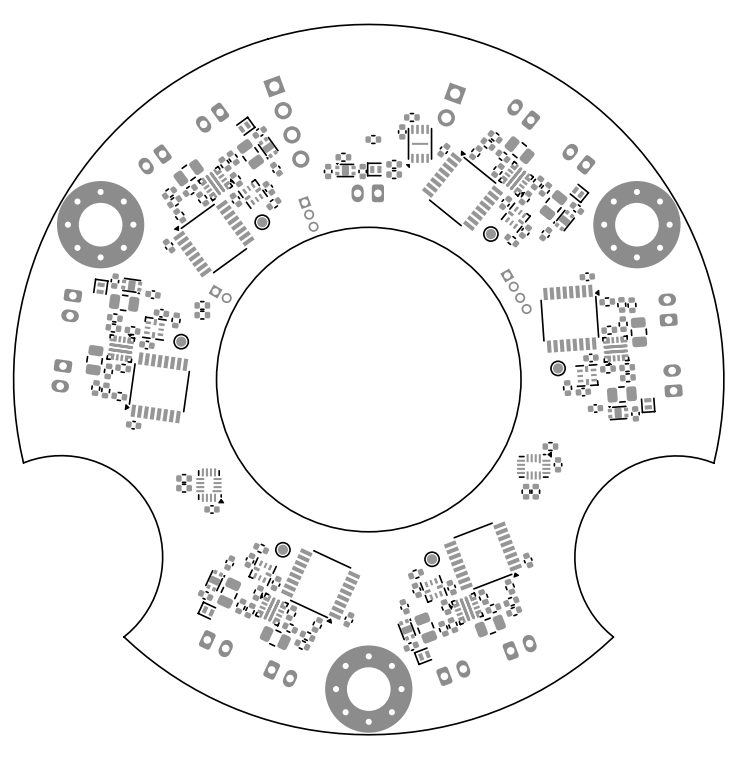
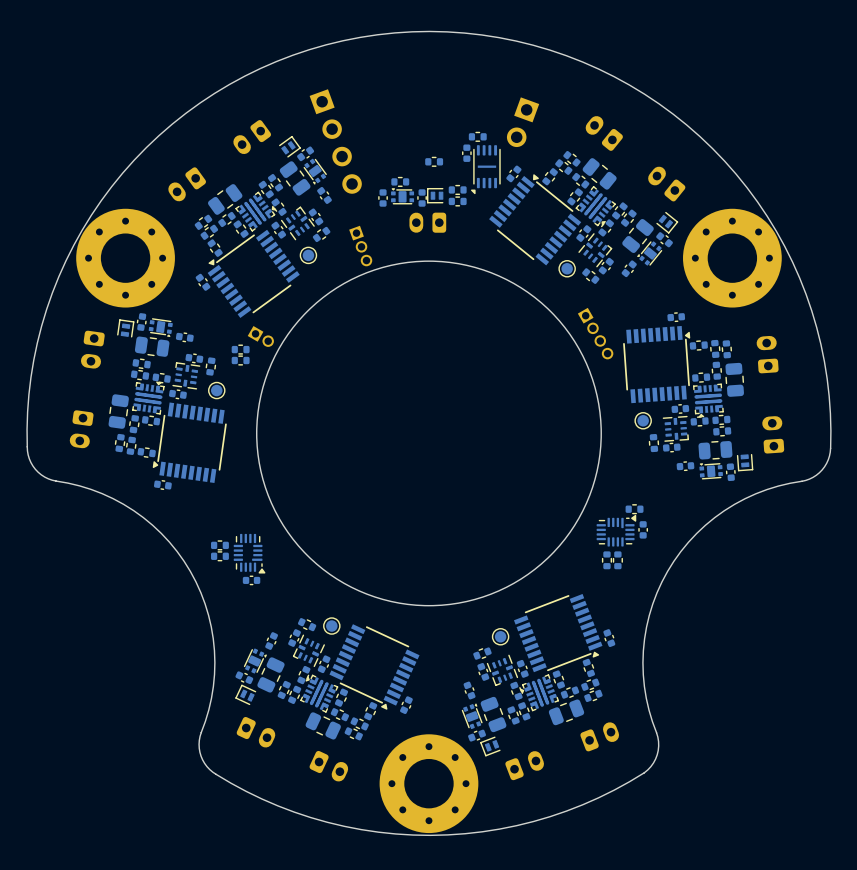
board edge: (268, 38) (212, 60) (173, 82) (149, 100) (126, 120) (95, 152) (61, 201) (47, 228) (30, 270) (17, 328) (13, 373) (14, 403) (23, 462) (54, 455) (86, 458) (116, 471) (139, 493) (149, 506) (158, 528) (162, 552) (162, 568) (159, 584) (149, 606) (135, 626) (123, 636) (158, 665) (196, 690) (236, 709) (265, 719) (294, 726) (338, 733) (398, 733) (428, 729) (472, 719) (514, 703) (554, 682) (590, 656) (613, 637) (601, 626) (587, 606) (580, 591) (575, 568) (574, 552) (578, 528) (588, 506) (602, 487) (621, 472) (650, 459) (682, 456) (713, 463) (723, 403) (723, 358) (717, 314) (706, 270) (683, 215) (668, 189) (642, 152) (622, 130) (588, 100) (538, 67) (483, 43) (455, 35) (412, 27) (368, 24) (339, 25) (310, 29) (268, 38) -> (830, 448) (829, 396) (824, 361) (816, 327) (806, 294) (792, 262) (776, 231) (757, 201) (724, 161) (699, 136) (673, 114) (644, 94) (598, 69) (566, 55) (533, 45) (481, 34) (447, 31) (412, 31) (377, 34) (326, 44) (292, 55) (244, 76) (214, 93) (185, 113) (159, 135) (134, 160) (111, 186) (91, 215) (66, 260) (52, 292) (41, 326) (30, 377) (27, 411) (28, 454) (38, 472) (52, 480) (79, 485) (102, 493) (133, 510) (152, 525) (169, 542) (183, 561) (195, 581) (208, 615) (214, 650) (214, 674) (211, 698) (199, 744) (201, 756) (207, 766) (216, 774) (246, 791) (294, 812) (361, 829) (413, 835) (465, 833) (533, 821) (598, 797) (647, 769) (657, 754) (658, 741) (646, 698) (643, 674) (643, 650) (649, 615) (657, 592) (667, 571) (688, 542) (714, 517) (734, 504) (755, 493) (813, 477) (826, 463) (830, 448)

